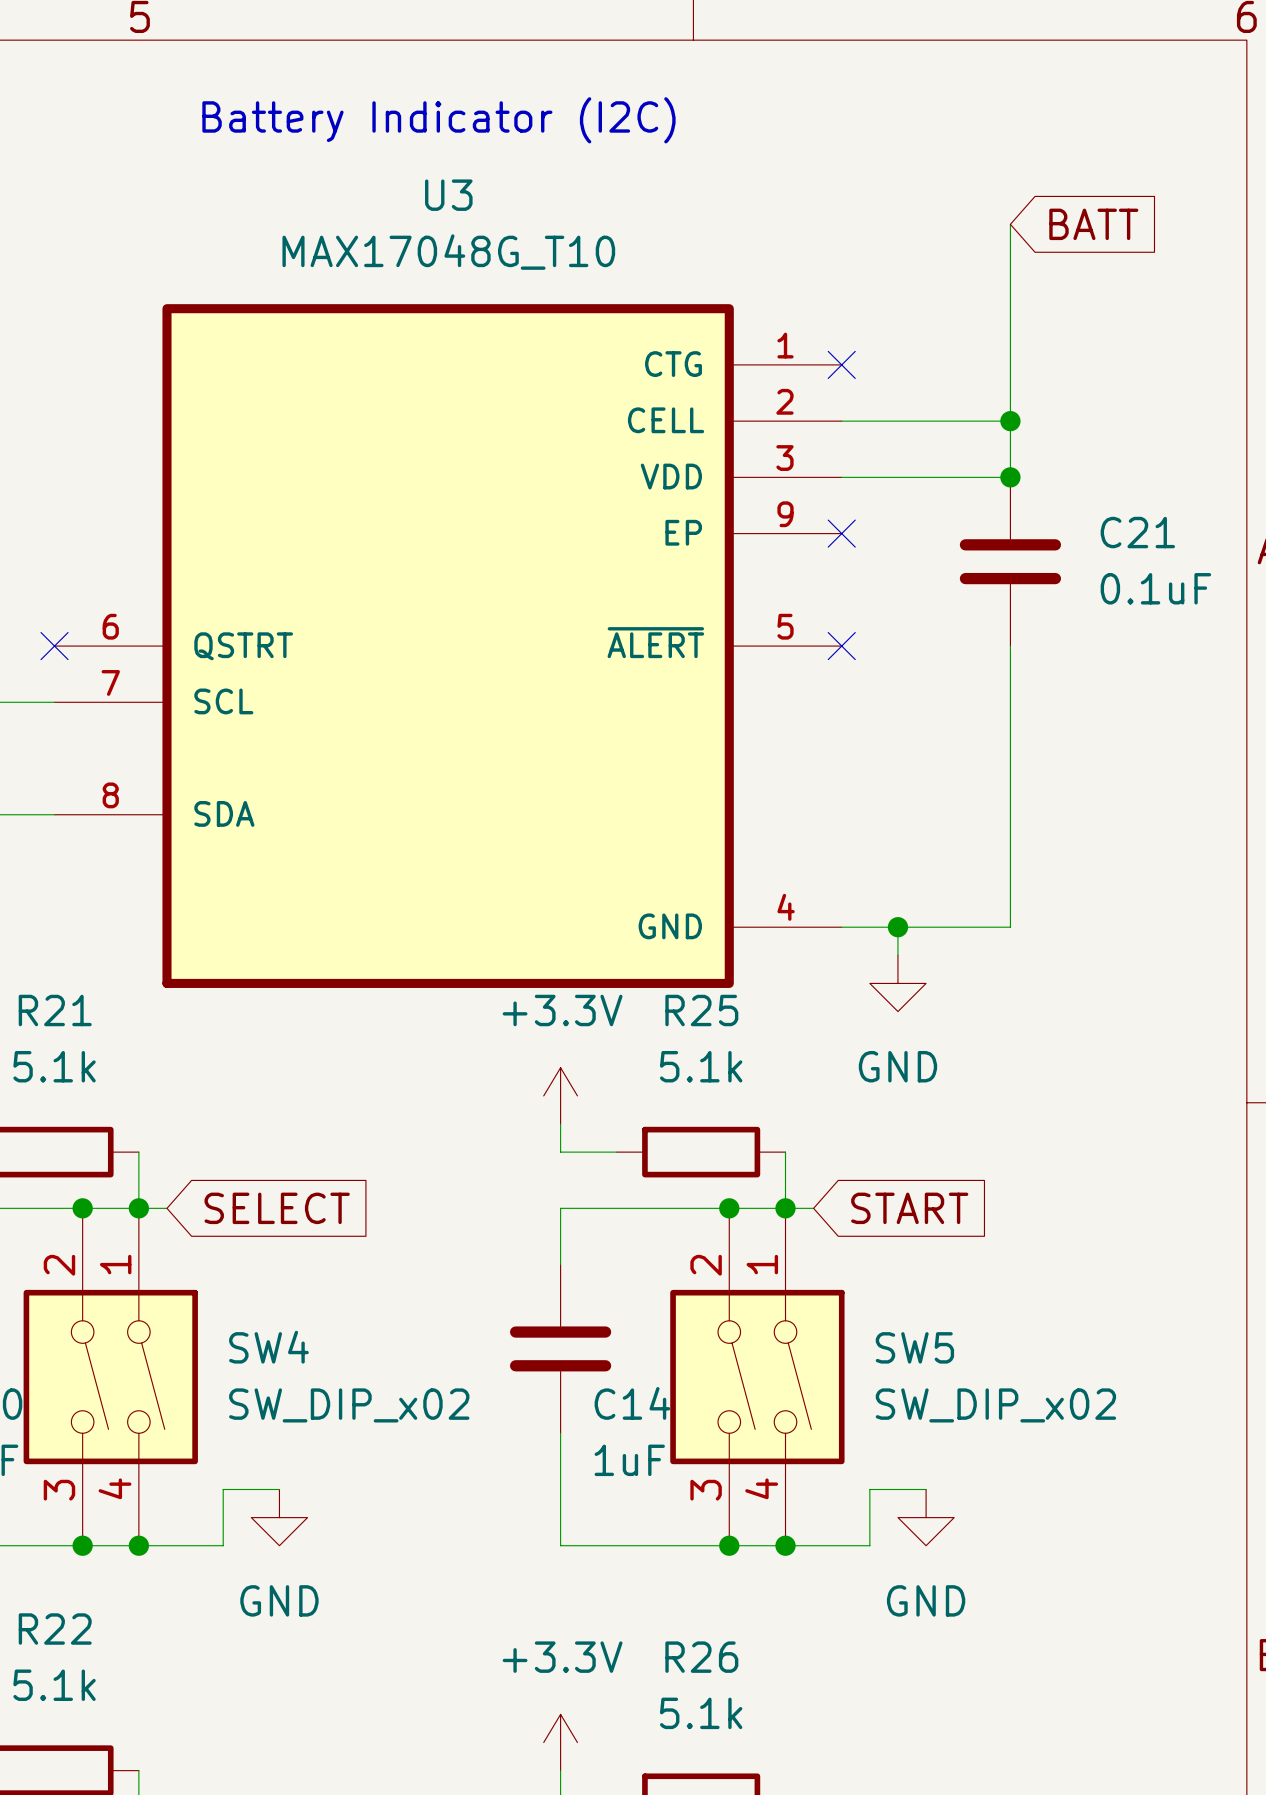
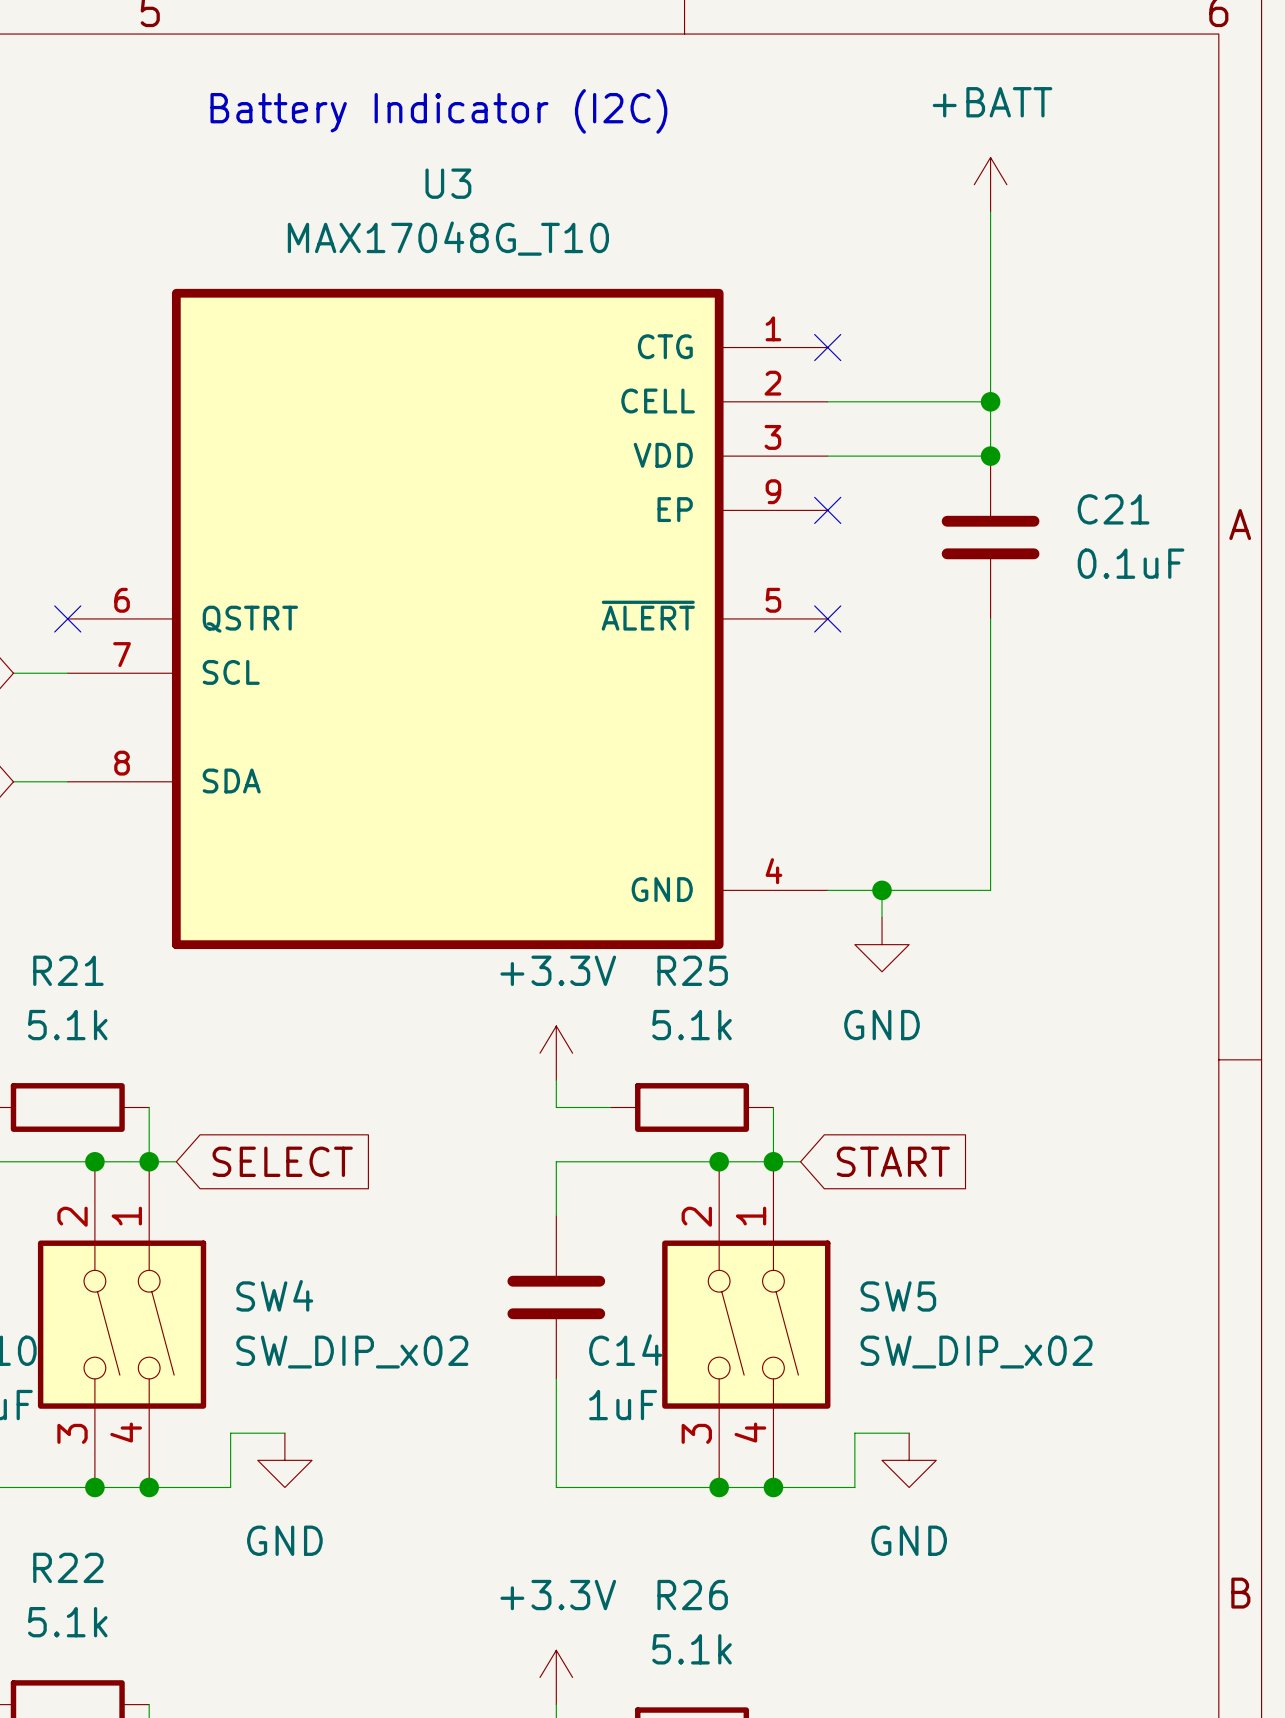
power symbol: none -> +BATT (990, 184)
global label: BATT (1093, 224) -> none

